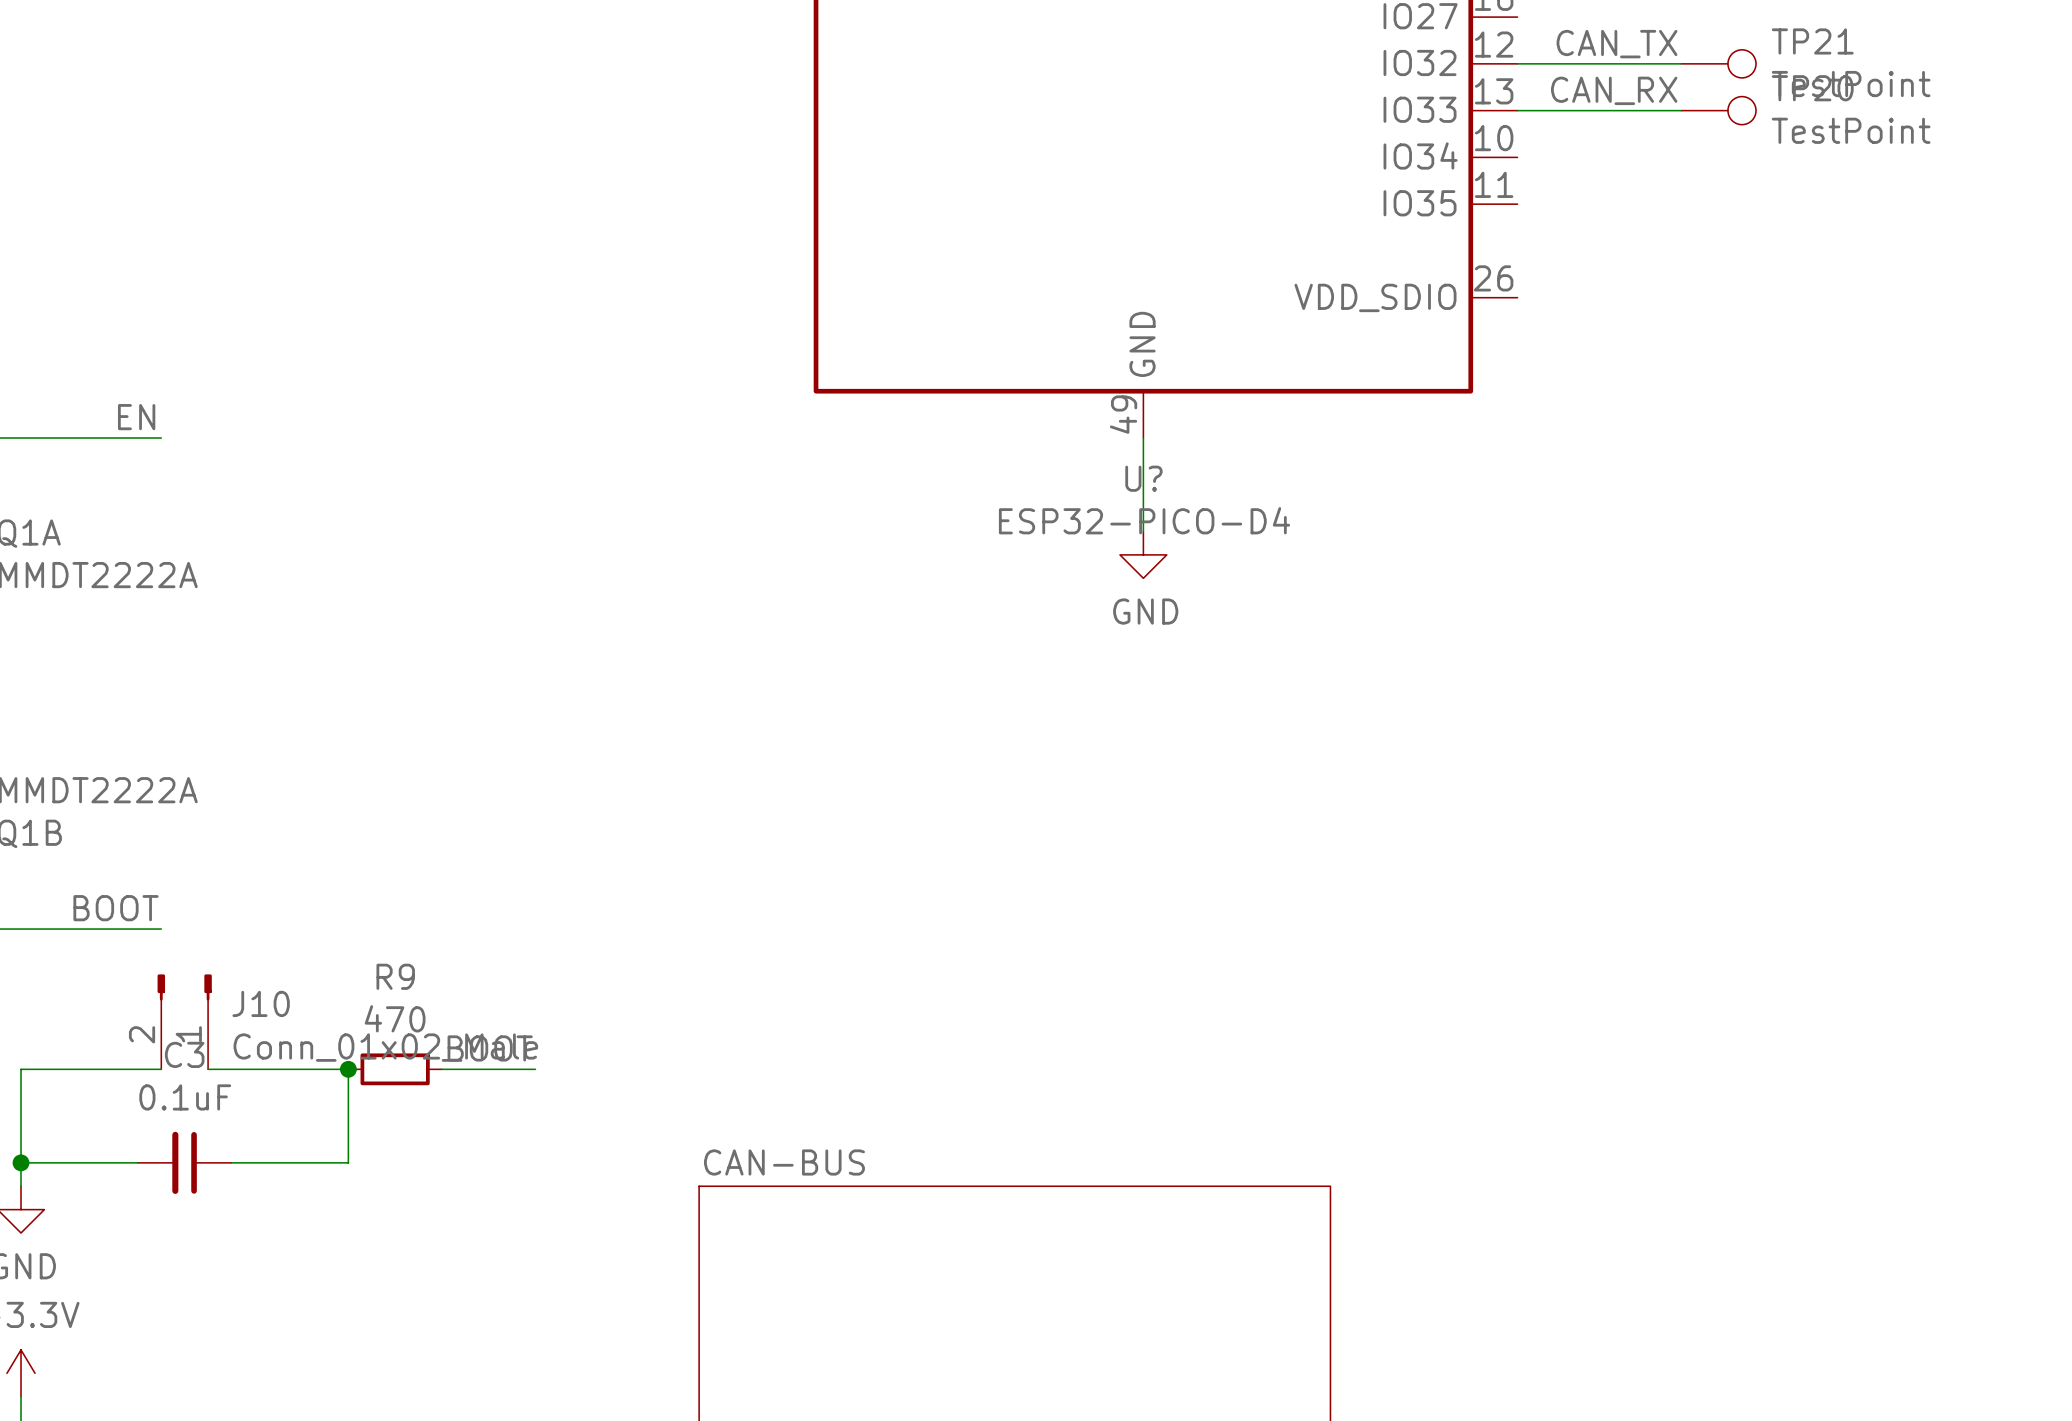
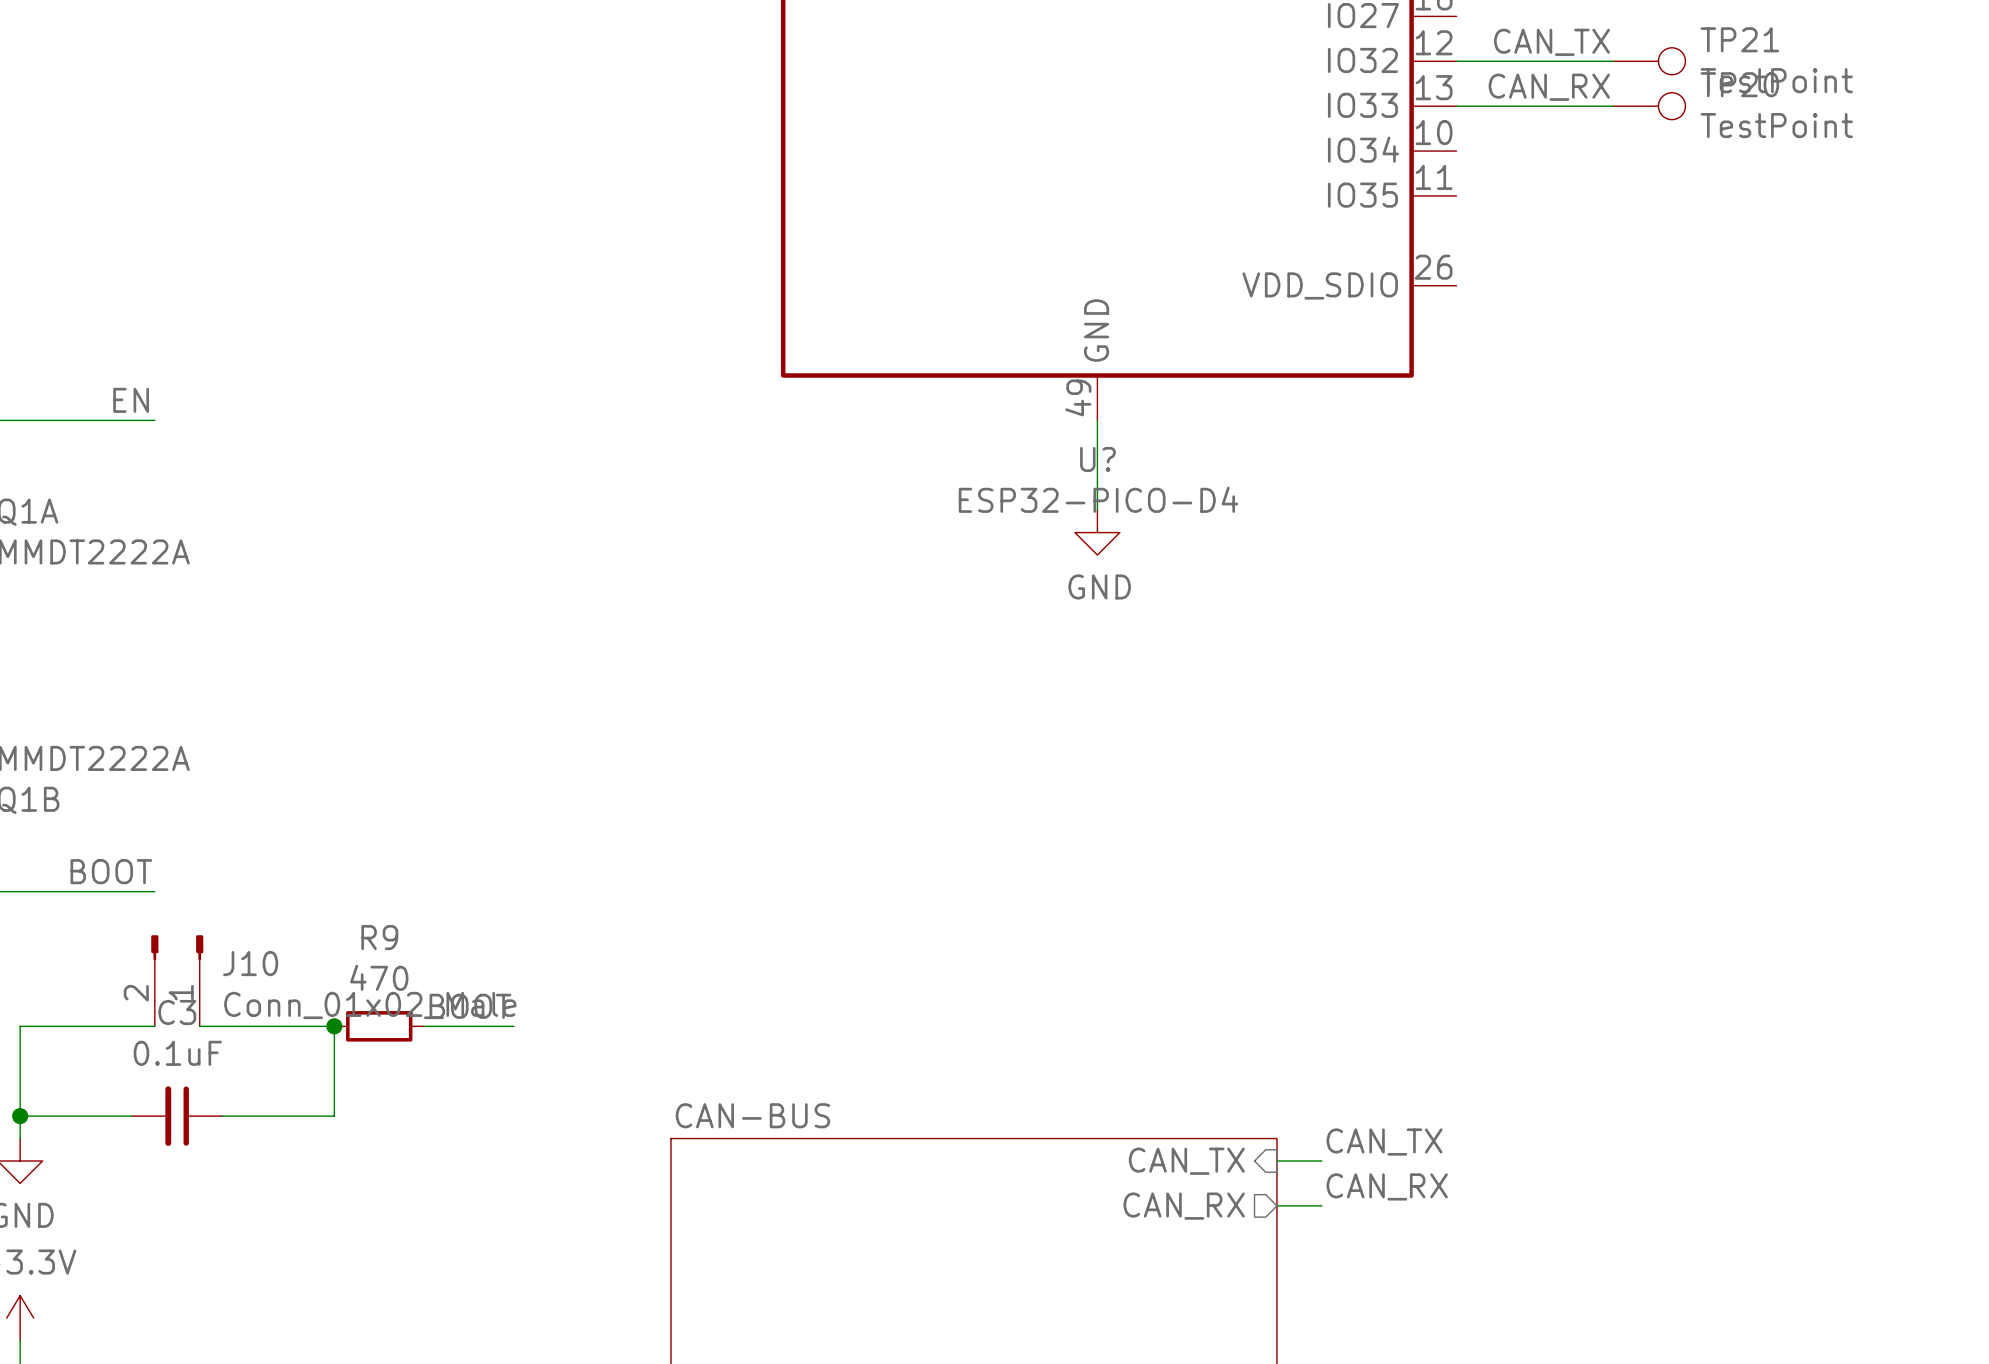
label: none -> CAN_TX (1384, 1142)
sheet pin: none -> CAN_TX (1186, 1161)
wire: none -> (1276, 1160) (1321, 1160)
label: none -> CAN_RX (1387, 1186)
sheet pin: none -> CAN_RX (1184, 1206)
wire: none -> (1276, 1205) (1321, 1205)

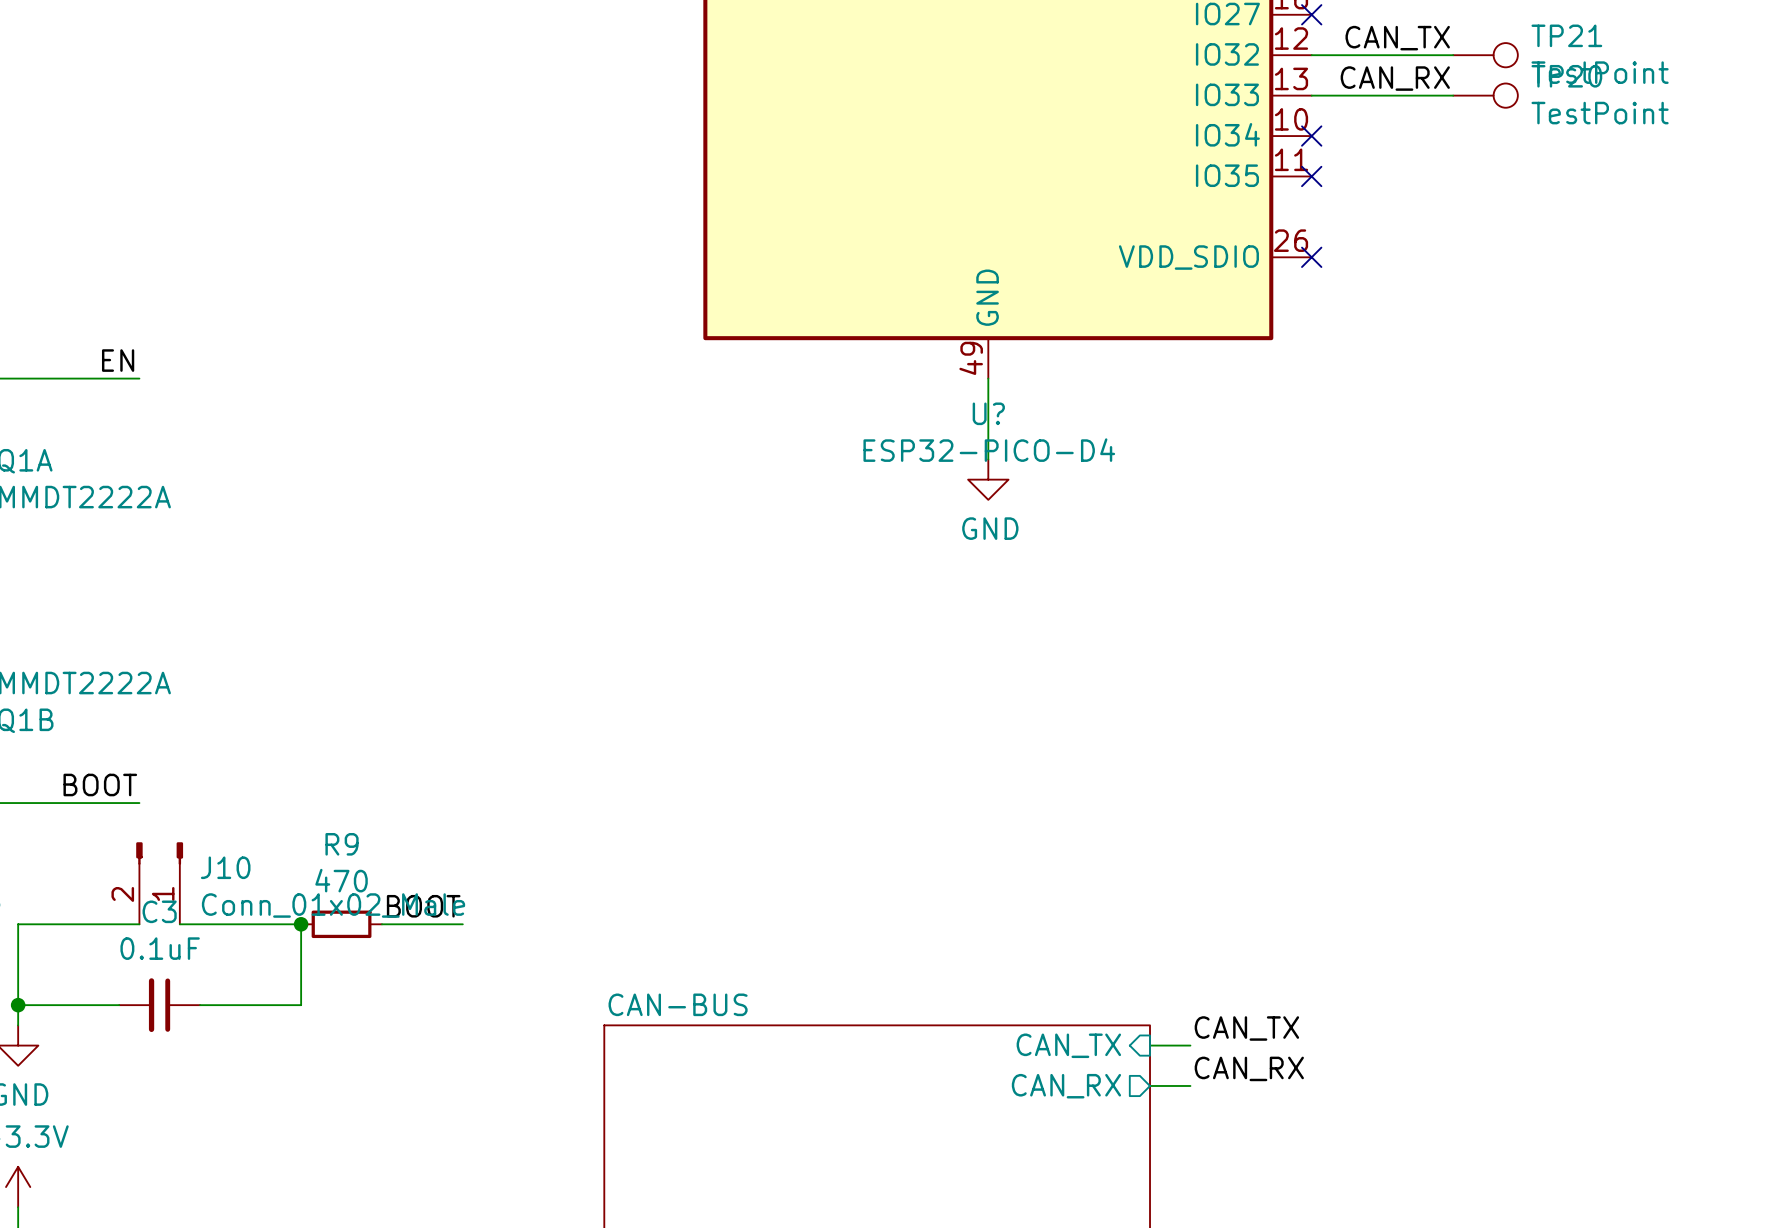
no-connect mark: none -> (1311, 14)
no-connect mark: none -> (1311, 136)
no-connect mark: none -> (1311, 176)
no-connect mark: none -> (1311, 257)

